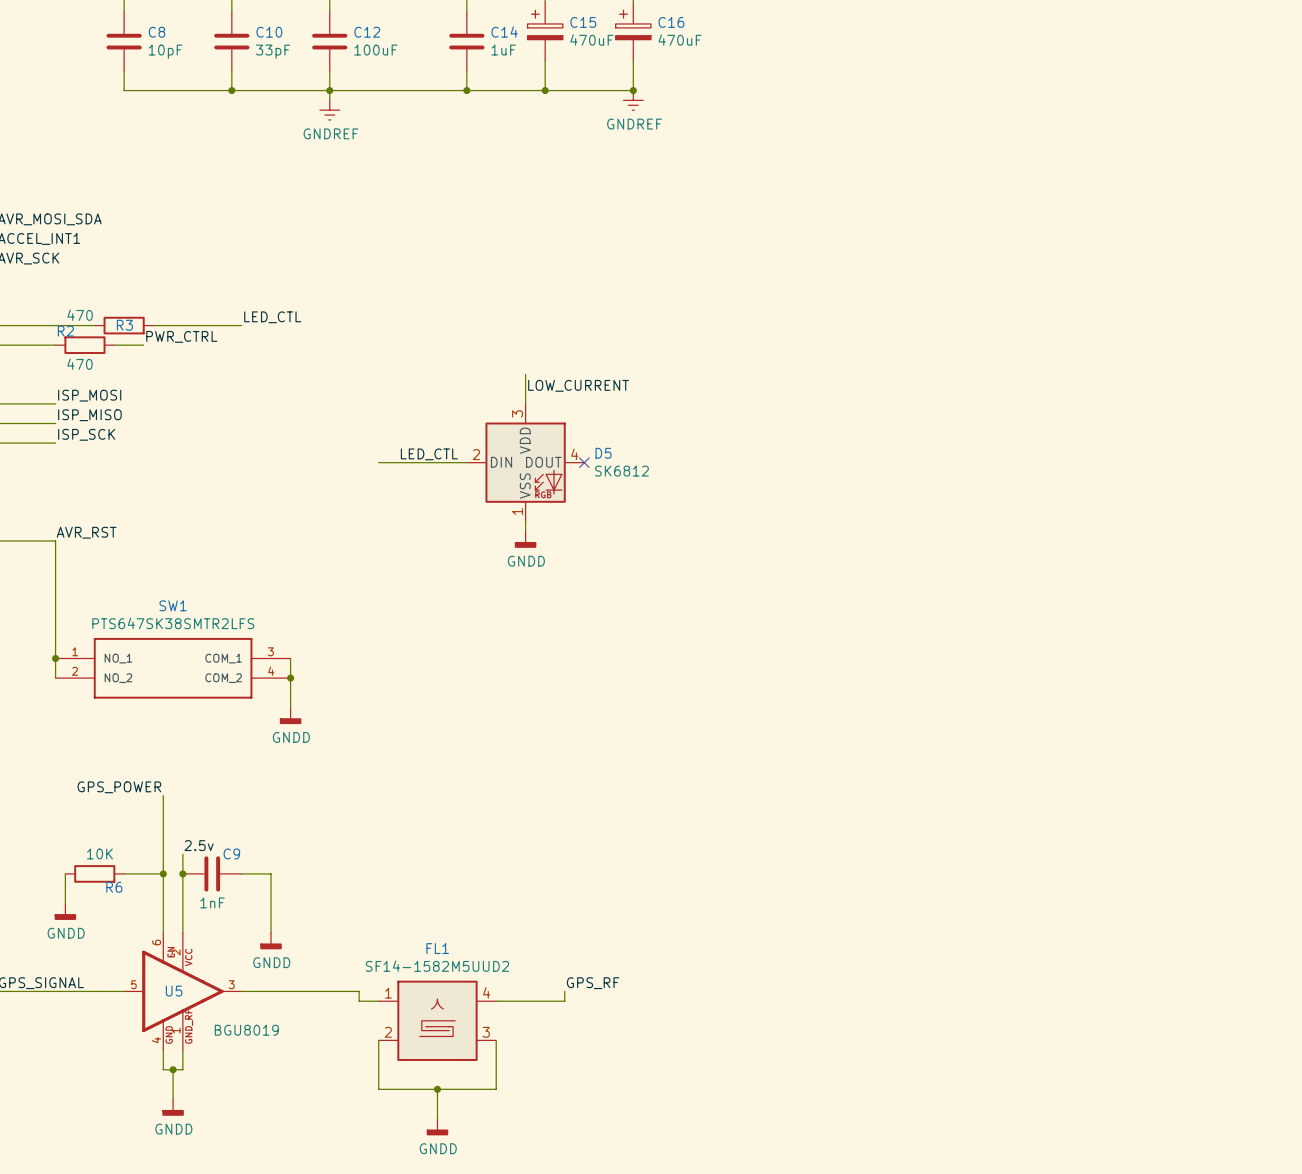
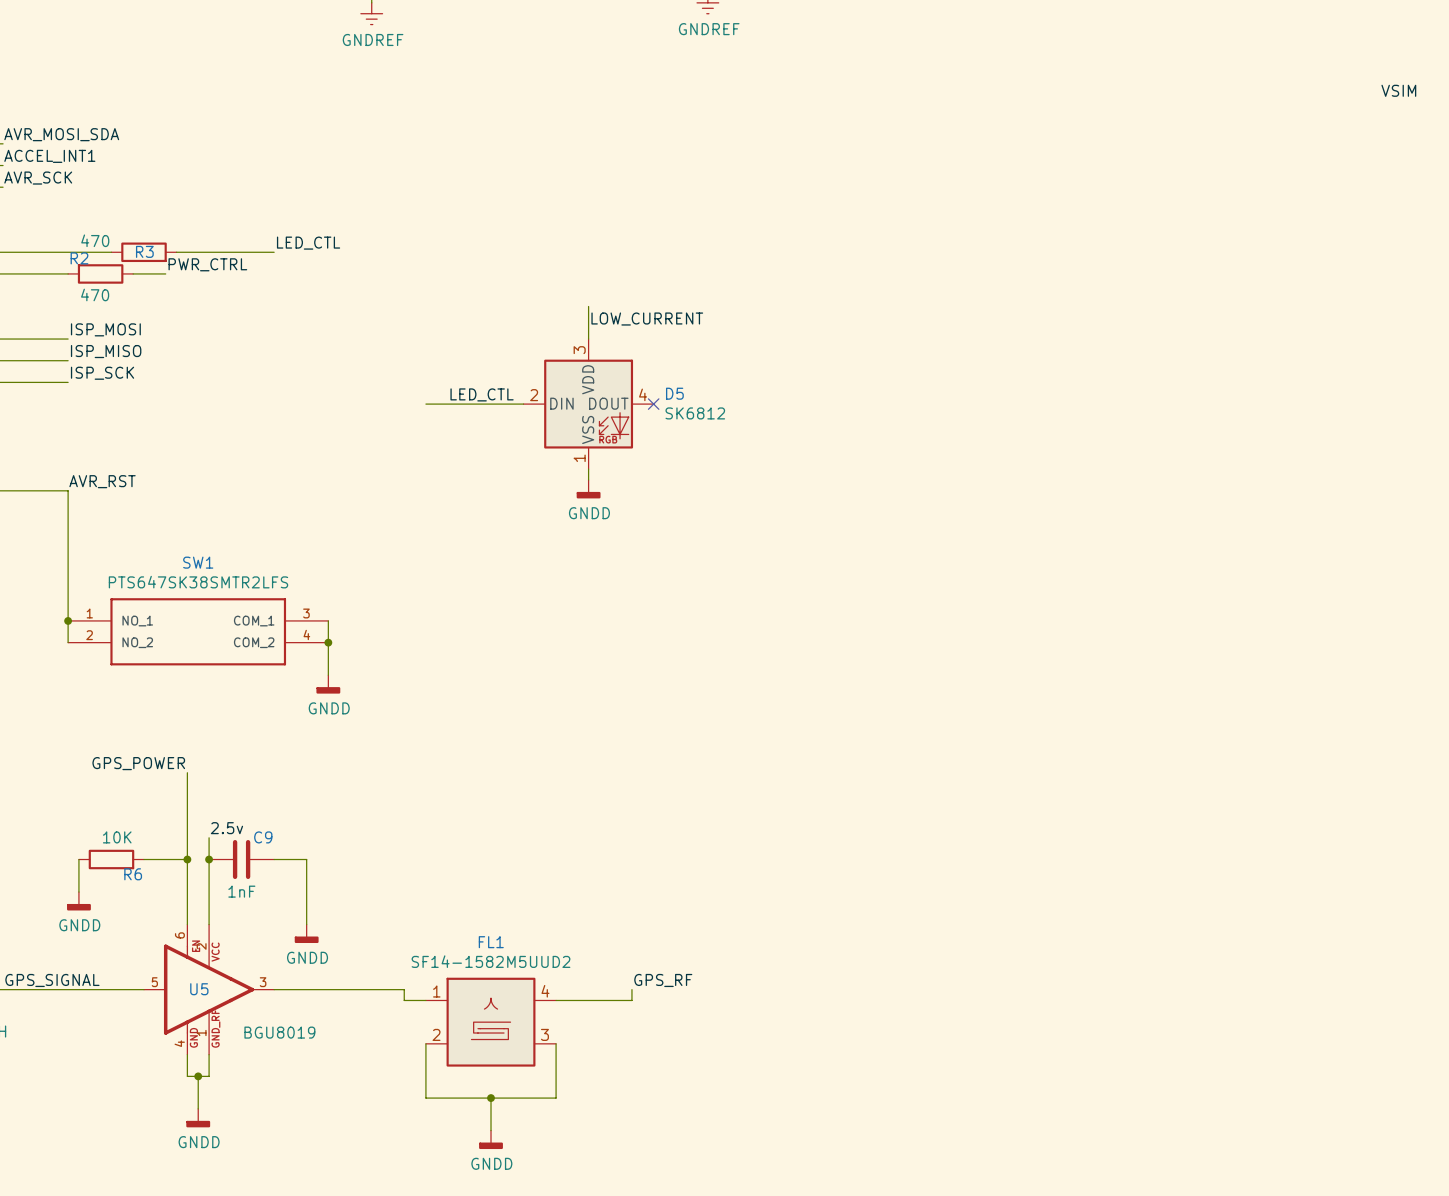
label: none -> VSIM (1398, 90)

